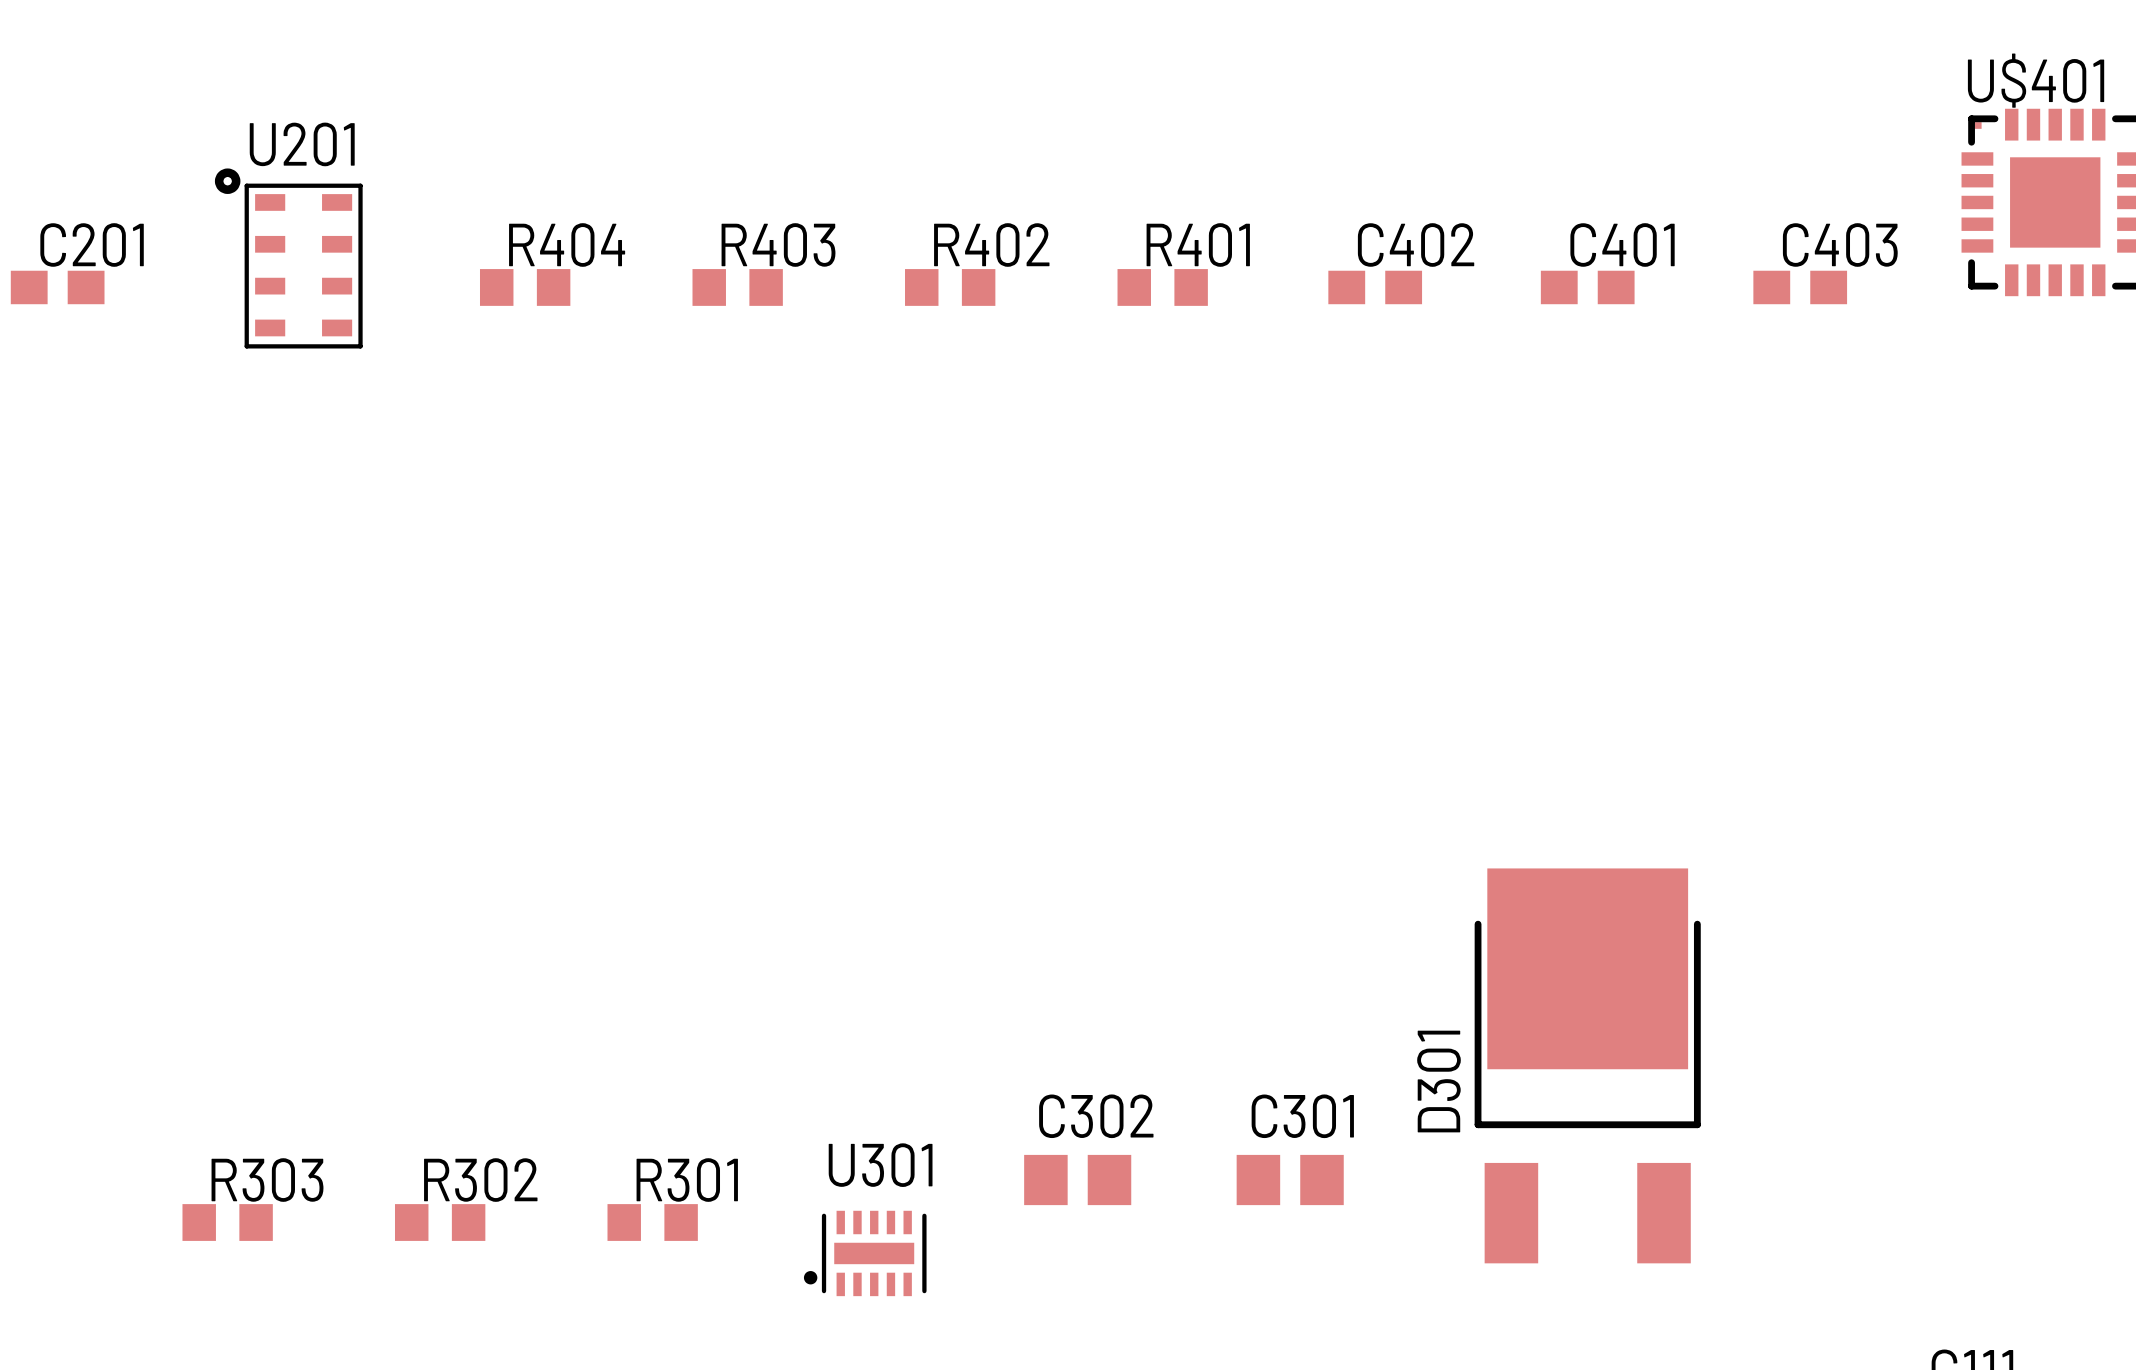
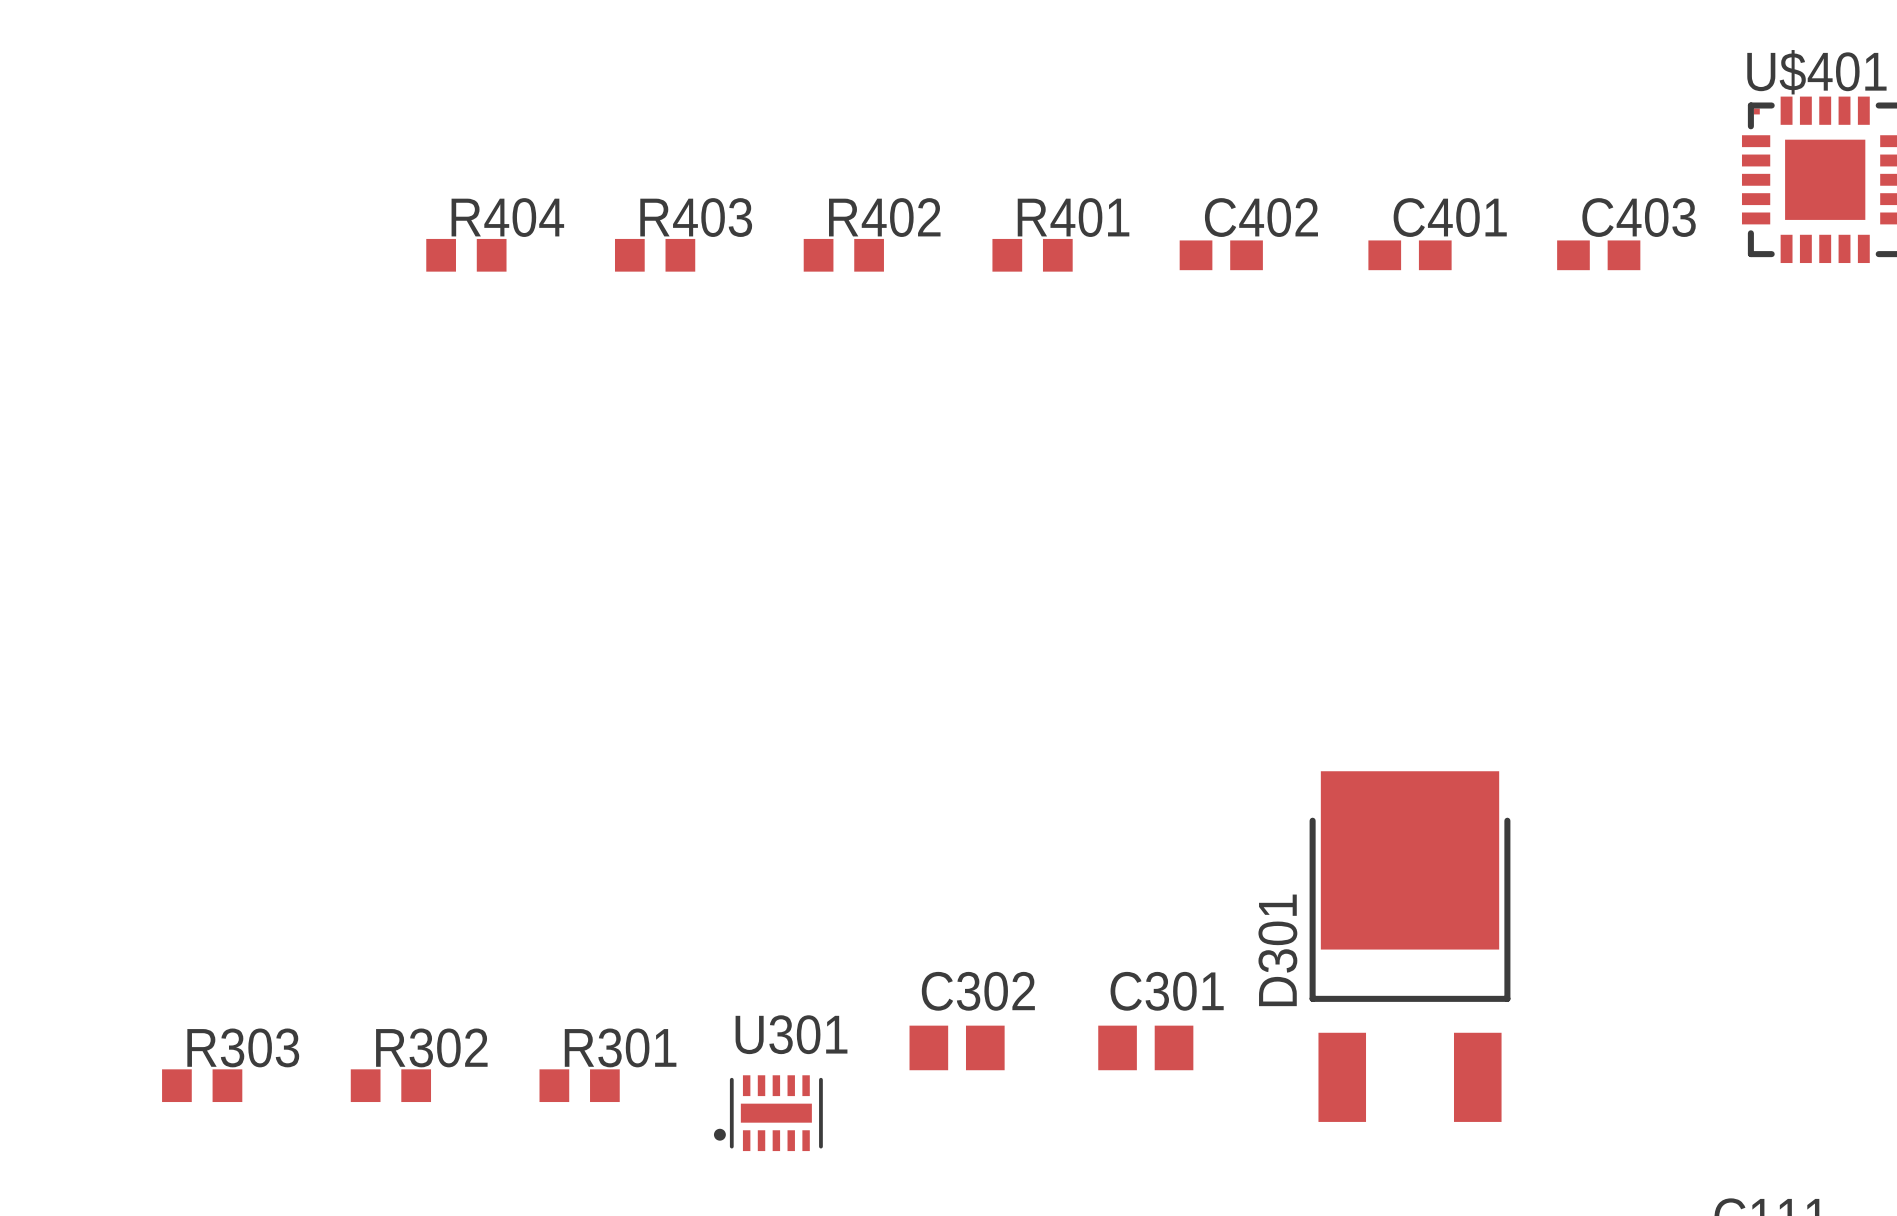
U201: (288, 258) -> none
C201: (57, 287) -> none

